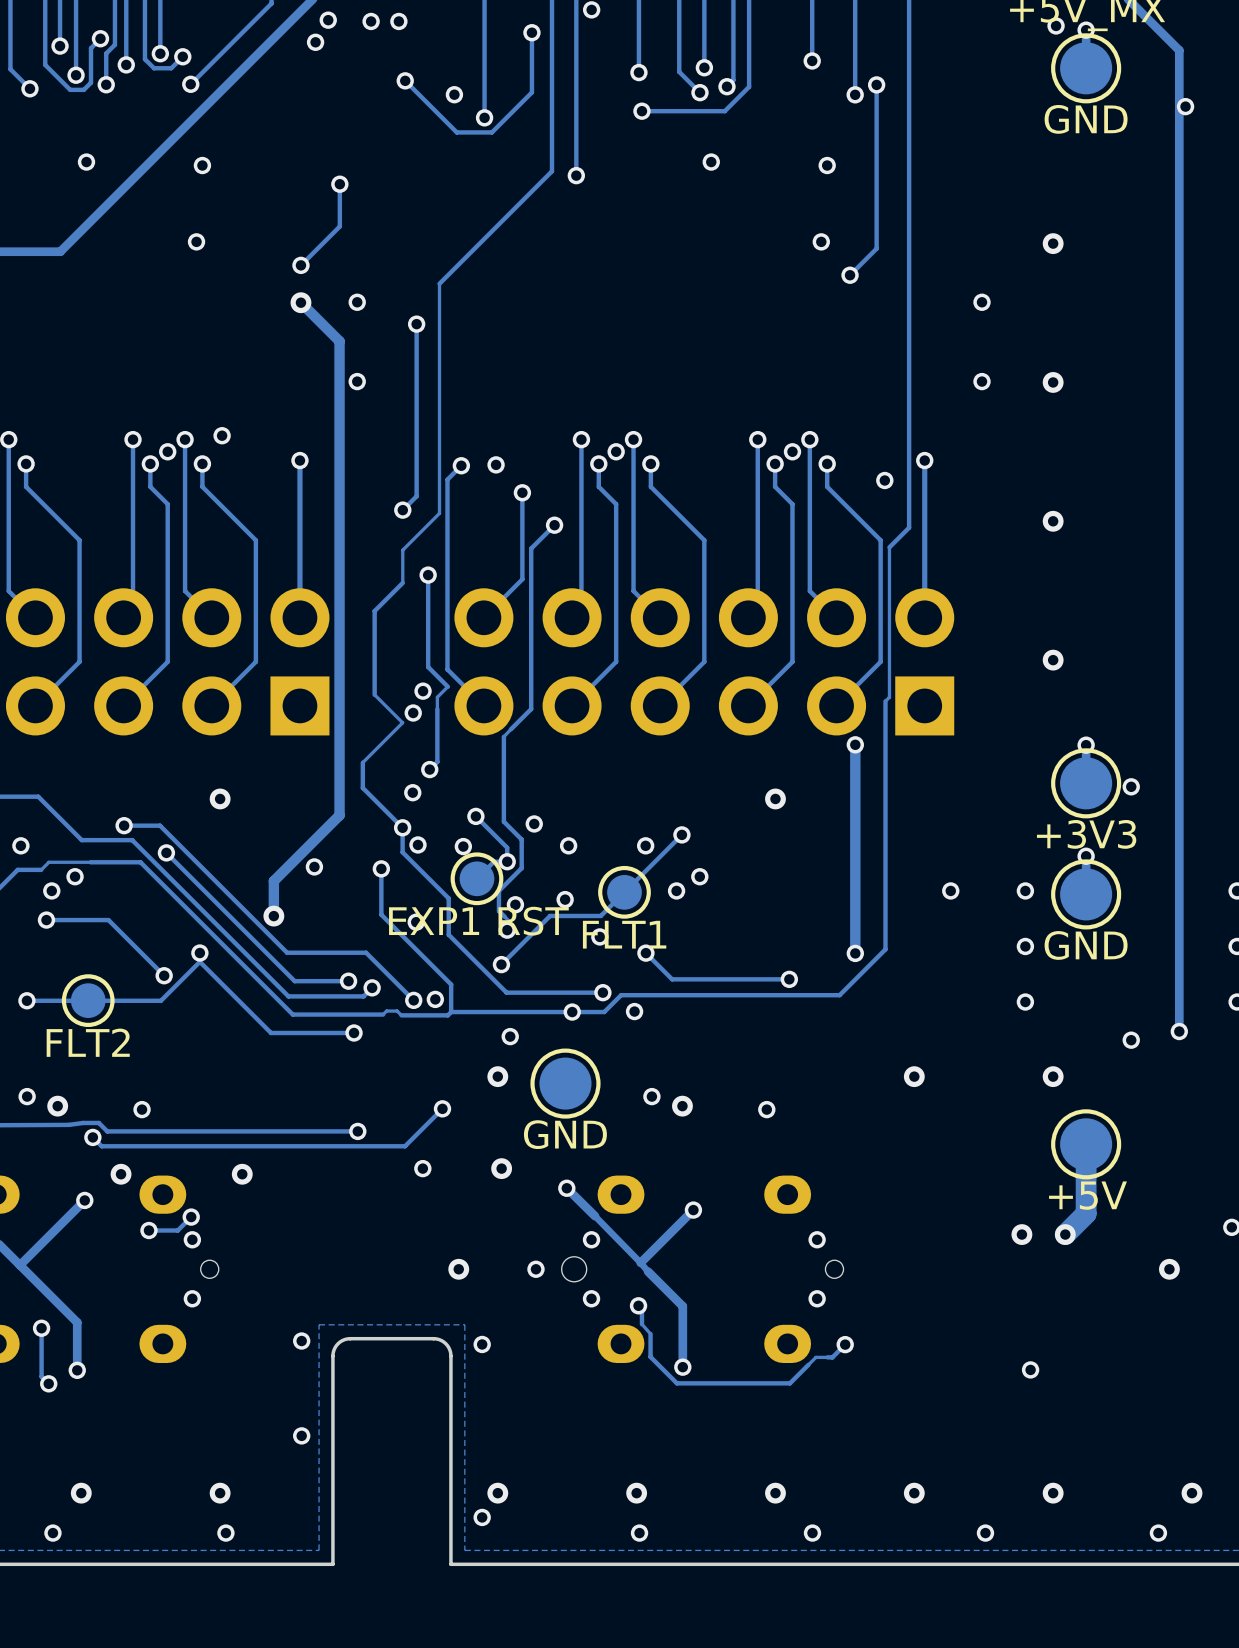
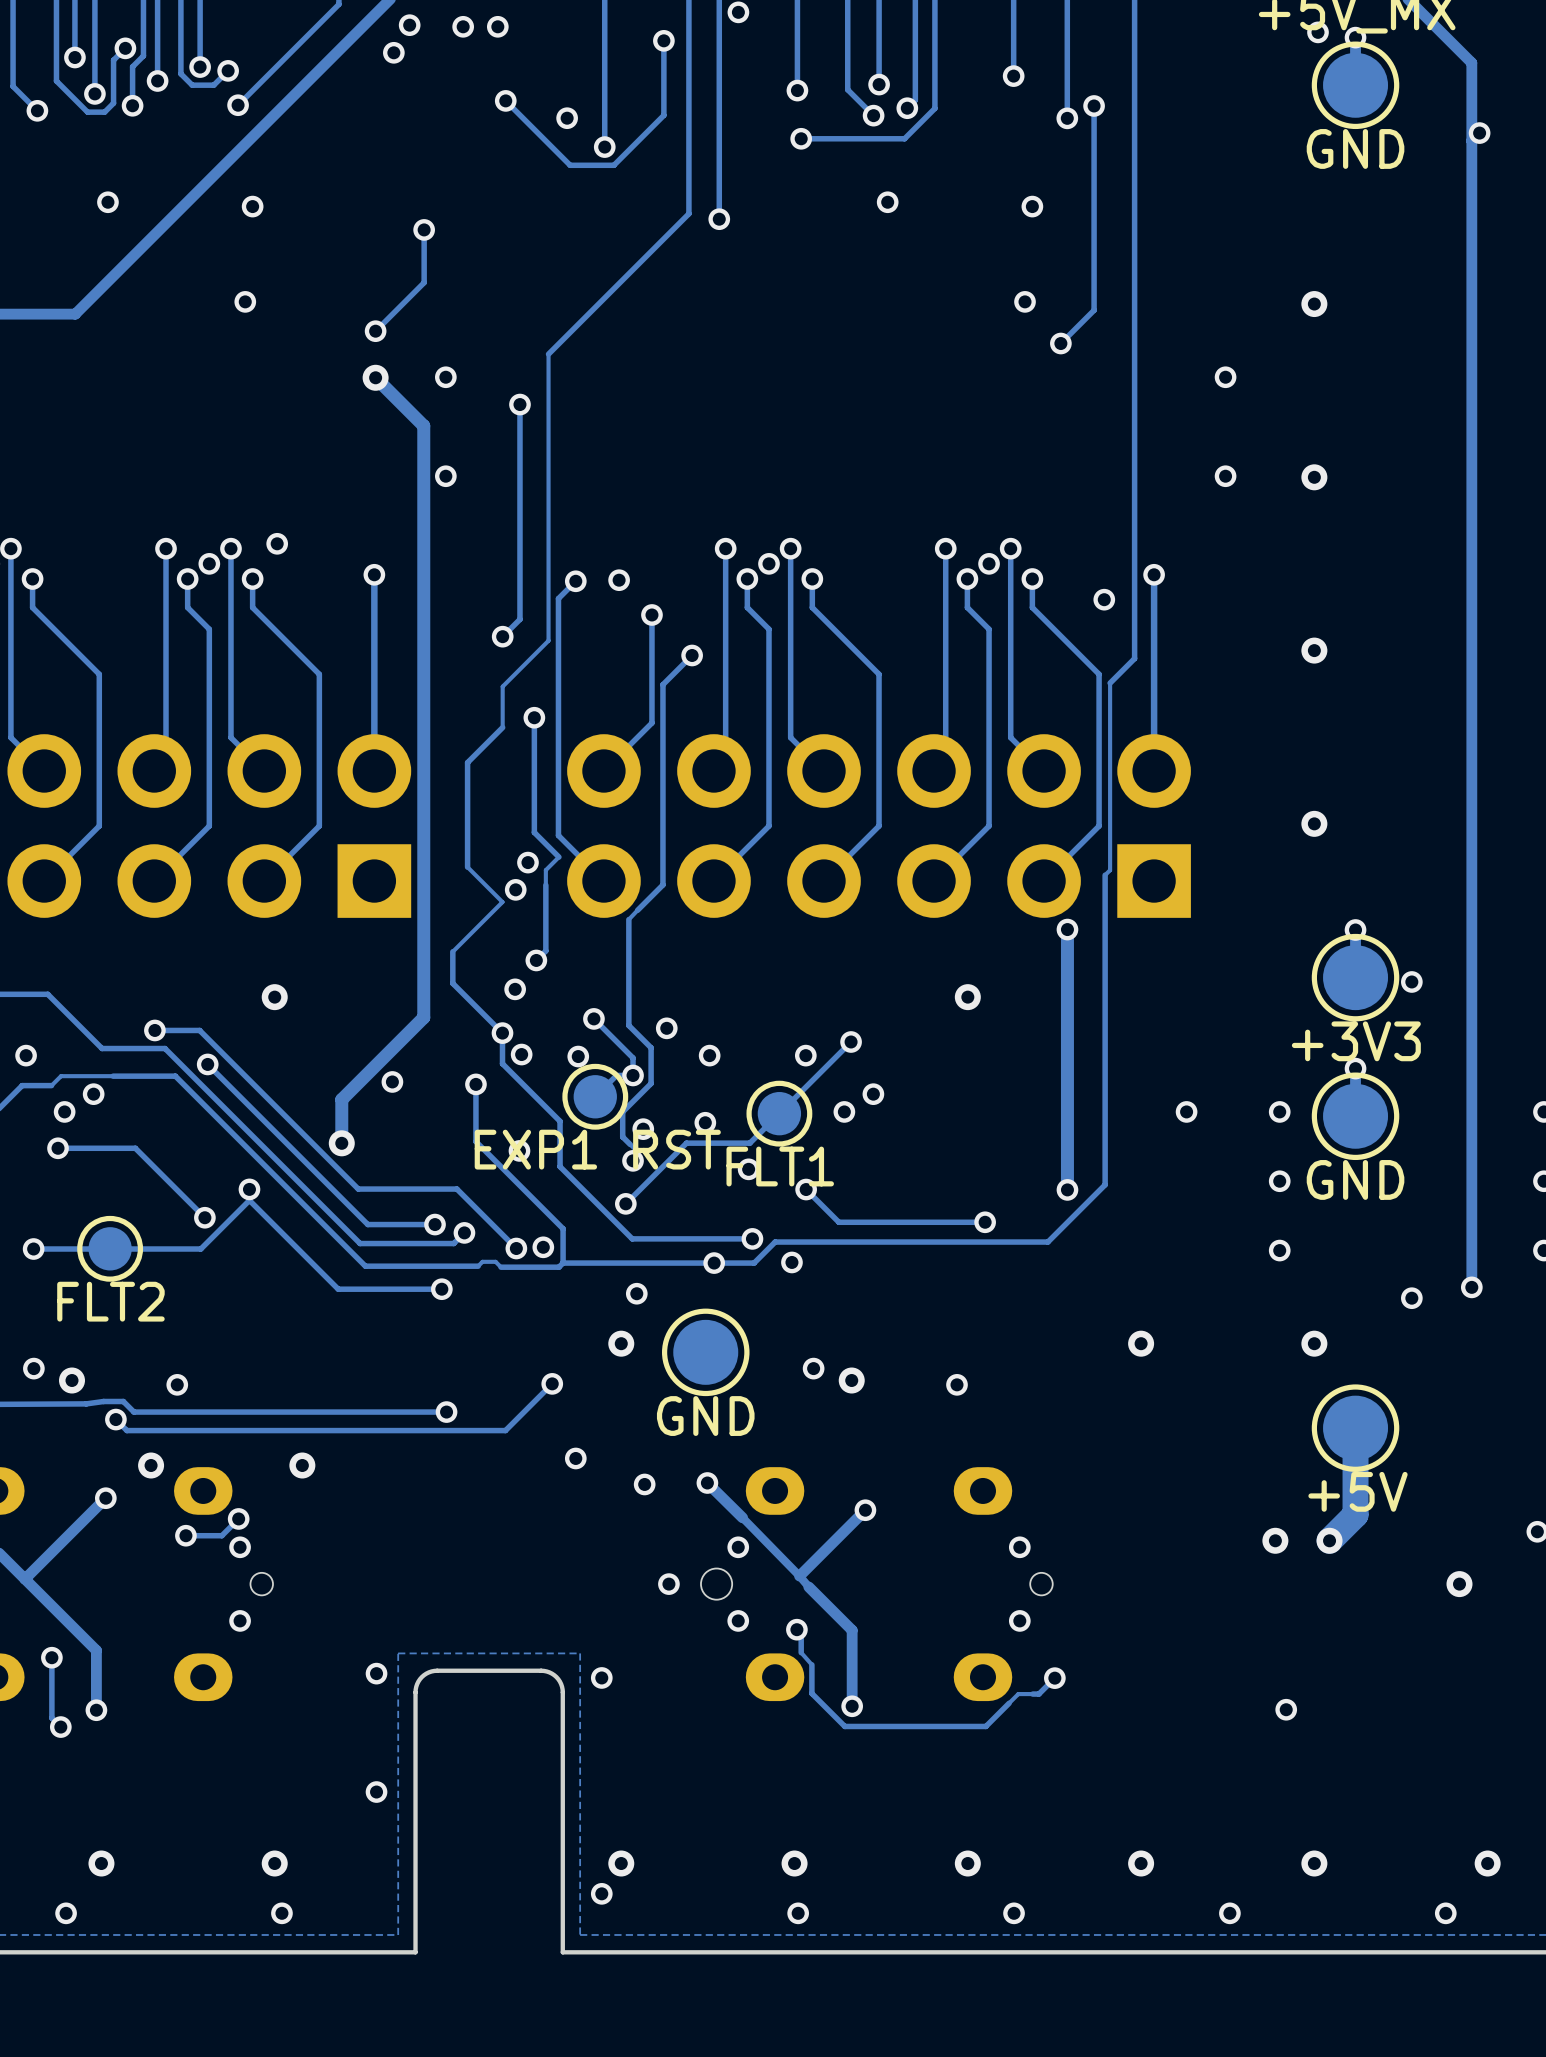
via position: (422, 1168) -> (575, 1458)
via: (501, 1168) -> none
via: none -> (644, 1484)
via: (458, 1269) -> none

